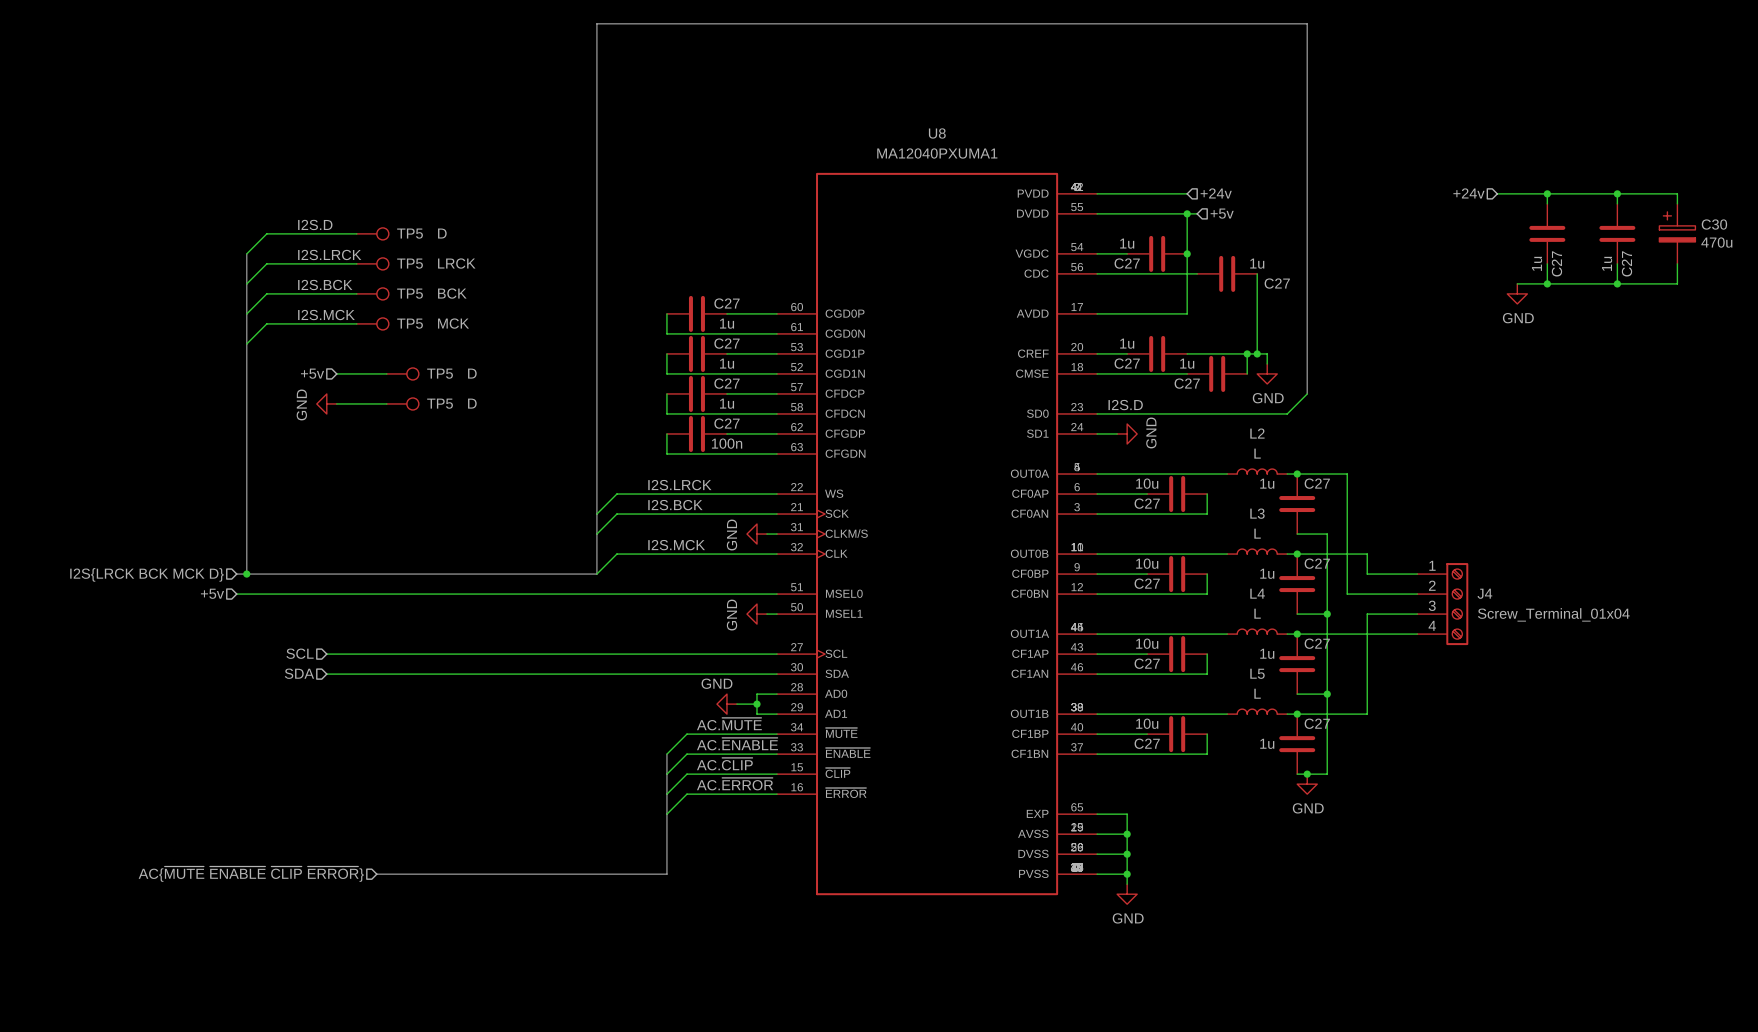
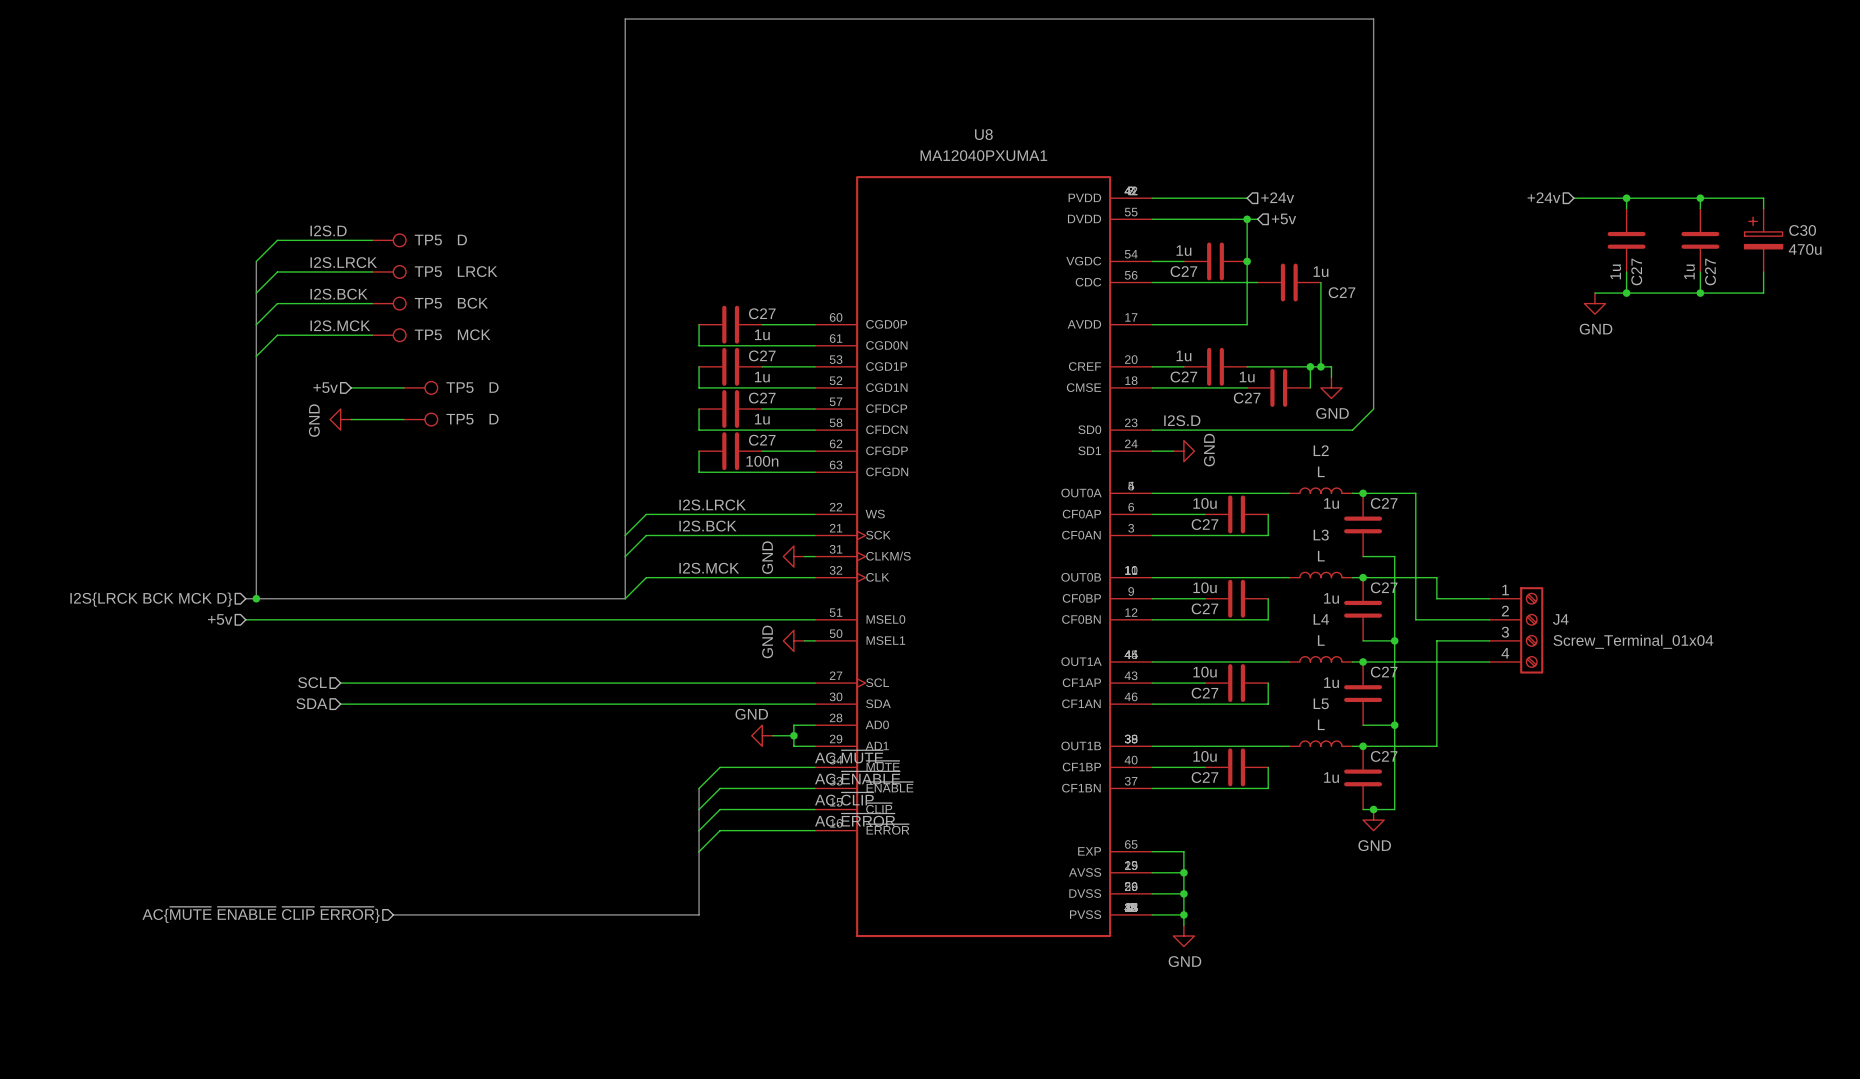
label position: AC.~{MUTE} (729, 724) -> AC.~{MUTE} (849, 756)
label position: AC.~{ENABLE} (737, 744) -> AC.~{ENABLE} (857, 777)
label position: AC.~{CLIP} (724, 764) -> AC.~{CLIP} (844, 799)
label position: AC.~{ERROR} (735, 784) -> AC.~{ERROR} (855, 820)

